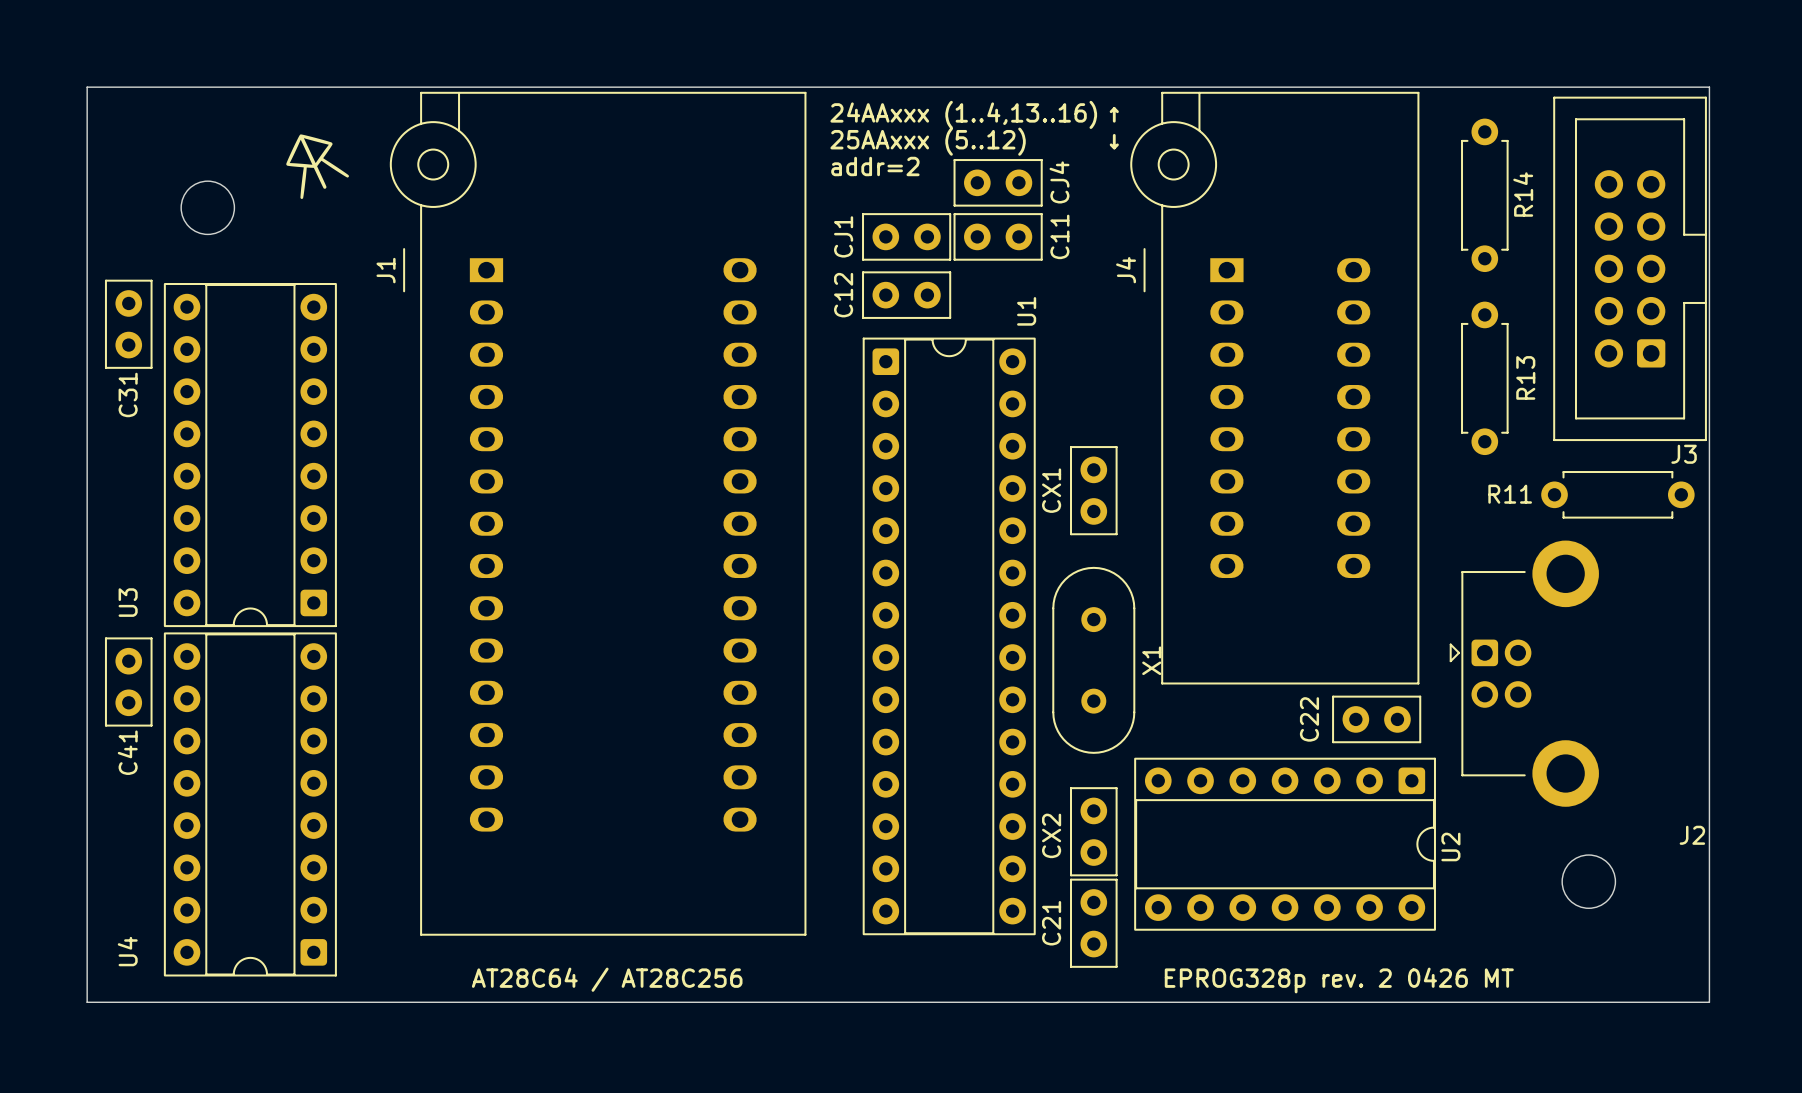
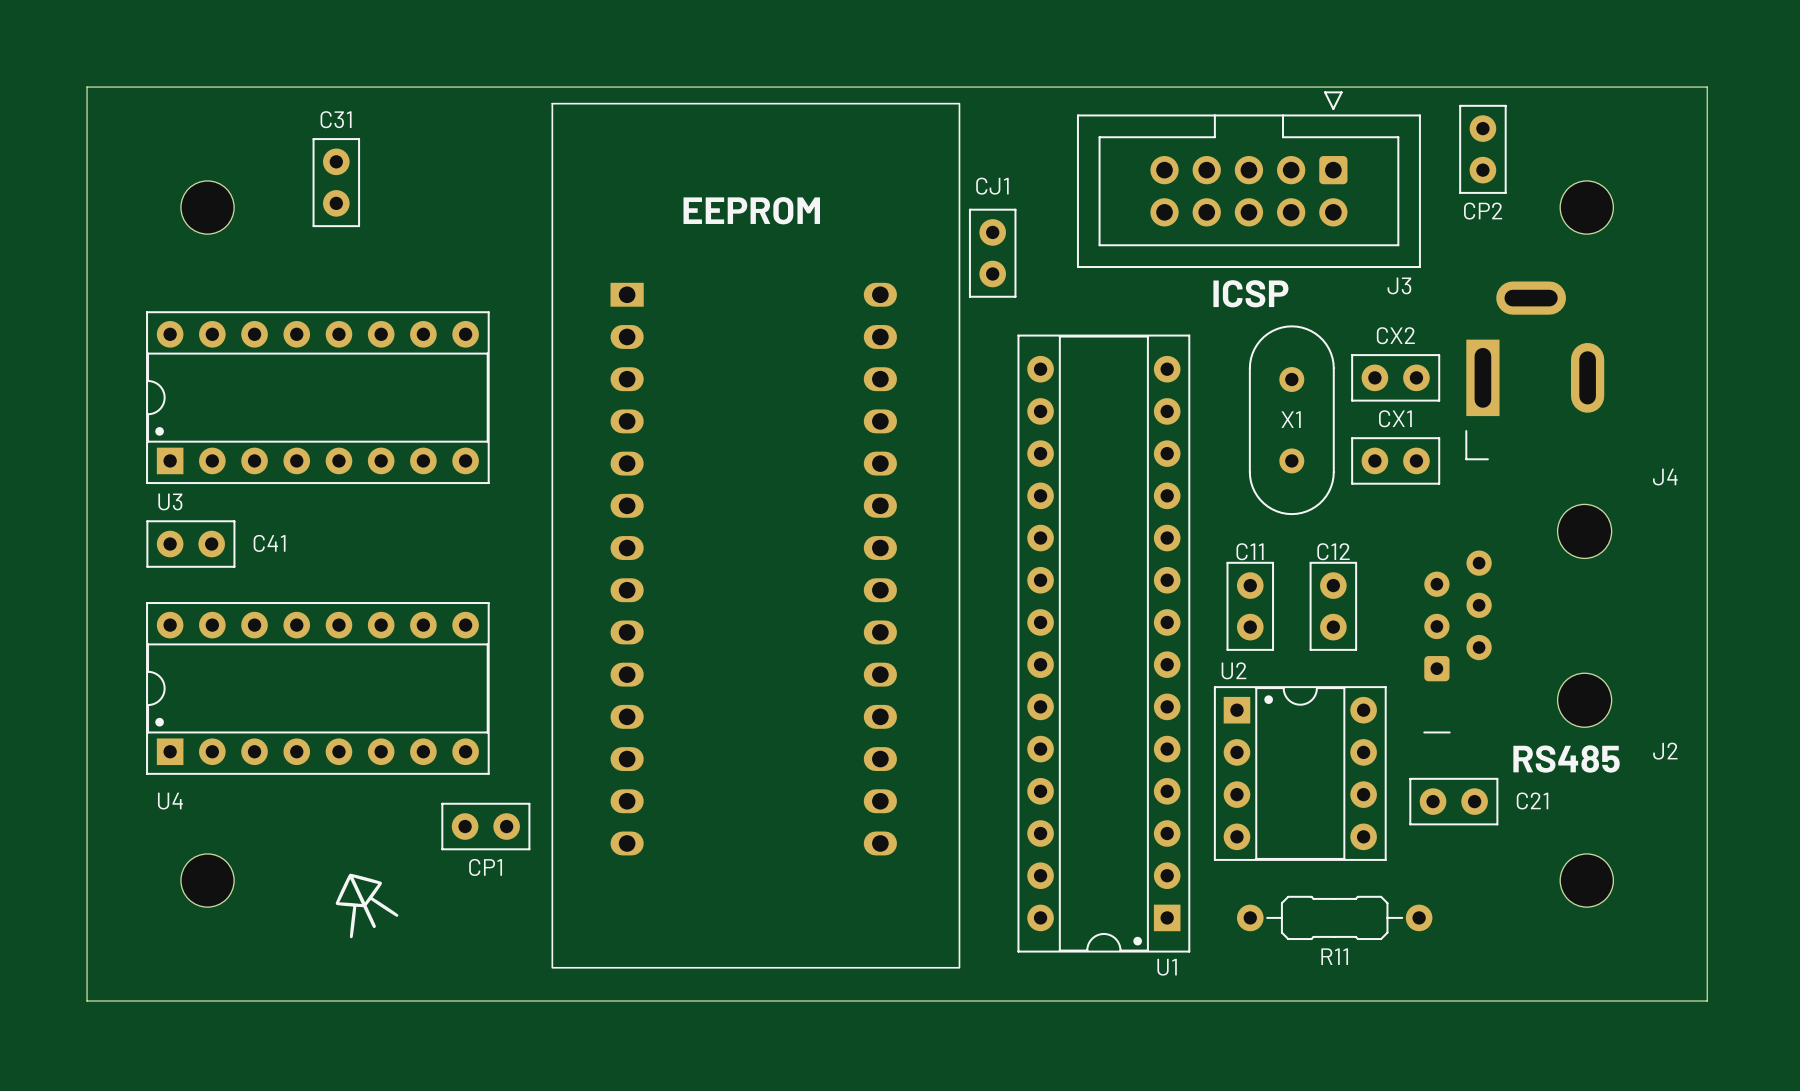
J4 footprint: [1130, 91, 1420, 685] -> [1465, 281, 1605, 461]
J3 footprint: [1553, 96, 1707, 442] -> [1076, 91, 1421, 269]
text: 24AAxxx (1..4,13..16) (963, 114) -> none
text: ↑ (1114, 114) -> none
drawing: [286, 134, 349, 199] -> none
text: 25AAxxx (5..12) (928, 141) -> none
text: ↓ (1114, 141) -> none
CP2: none -> (1482, 149)
text: addr=2 (875, 166) -> none
CJ4: (998, 182) -> none
R14: (1484, 195) -> none
part: none -> (1586, 207)
text: none -> EEPROM (751, 210)
CJ1 rotation: 0° (906, 236) -> 90° clockwise (992, 253)
CJ1 position: (906, 236) -> (992, 253)
C11 rotation: 0° (998, 236) -> 90° clockwise (1250, 606)
C11 position: (998, 236) -> (1250, 606)
C11 name position: C11 (1059, 236) -> C11 (1250, 551)
J4 name position: J4 (1126, 270) -> J4 (1665, 477)
U3 footprint: [163, 282, 337, 628] -> [146, 311, 490, 485]
text: none -> ICSP (1250, 293)
C12 rotation: 0° (906, 295) -> 90° clockwise (1333, 606)
C12 position: (906, 295) -> (1333, 606)
U1 name position: U1 (1026, 311) -> U1 (1167, 967)
C31 position: (128, 324) -> (336, 182)
U1 footprint: [862, 337, 1036, 936] -> [1017, 334, 1191, 953]
R13: (1484, 378) -> none
C31 name rotation: 0° (128, 394) -> 90° clockwise (336, 119)
C31 name position: C31 (128, 394) -> C31 (336, 119)
J3 name position: J3 (1684, 454) -> J3 (1399, 285)
R11 footprint: [1541, 471, 1695, 519] -> [1236, 895, 1433, 941]
CX1 rotation: 0° (1093, 490) -> 90° clockwise (1395, 460)
CX1 position: (1093, 490) -> (1395, 460)
R11 name position: R11 (1510, 494) -> R11 (1334, 956)
J1: (598, 513) -> none
part: none -> (755, 535)
J2 footprint: [1449, 540, 1599, 807] -> [1423, 504, 1612, 734]
X1 footprint: [1052, 566, 1136, 754] -> [1248, 325, 1335, 516]
U3 name position: U3 (128, 602) -> U3 (170, 501)
U4 footprint: [163, 632, 337, 977] -> [146, 602, 490, 775]
X1 name position: X1 (1151, 660) -> X1 (1291, 419)
C41 rotation: 0° (128, 681) -> 90° clockwise (190, 544)
C41 position: (128, 681) -> (190, 544)
C22: (1376, 719) -> none
C41 name position: C41 (127, 752) -> C41 (269, 543)
U2 footprint: [1134, 757, 1436, 931] -> [1213, 686, 1387, 861]
text: none -> RS485 (1566, 758)
CP1: none -> (485, 826)
CX2 rotation: 0° (1093, 831) -> 90° clockwise (1395, 377)
CX2 position: (1093, 831) -> (1395, 377)
J2 name position: J2 (1692, 835) -> J2 (1665, 751)
U2 name position: U2 (1450, 846) -> U2 (1233, 670)
drawing: none -> [335, 873, 399, 939]
part: none -> (207, 880)
C21 name position: C21 (1051, 923) -> C21 (1532, 800)
C21 rotation: 0° (1093, 923) -> 90° clockwise (1453, 801)
C21 position: (1093, 923) -> (1453, 801)
U4 name position: U4 (127, 951) -> U4 (170, 801)
text: AT28C64 / AT28C256 (607, 979) -> none
text: EPROG328p rev. 2 0426 MT (1339, 980) -> none

